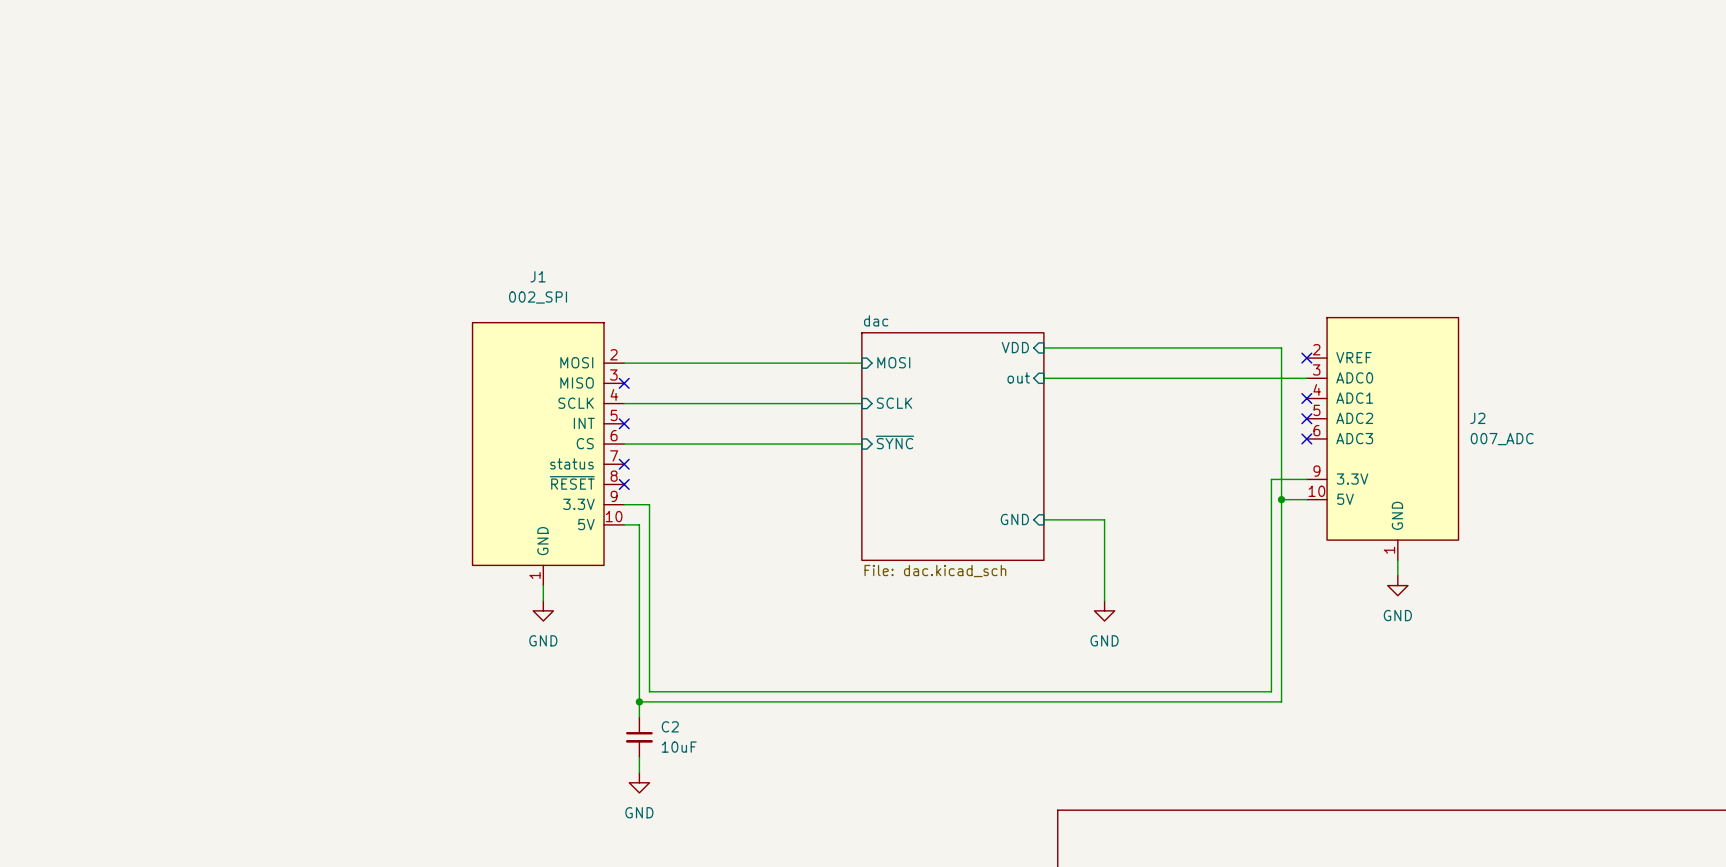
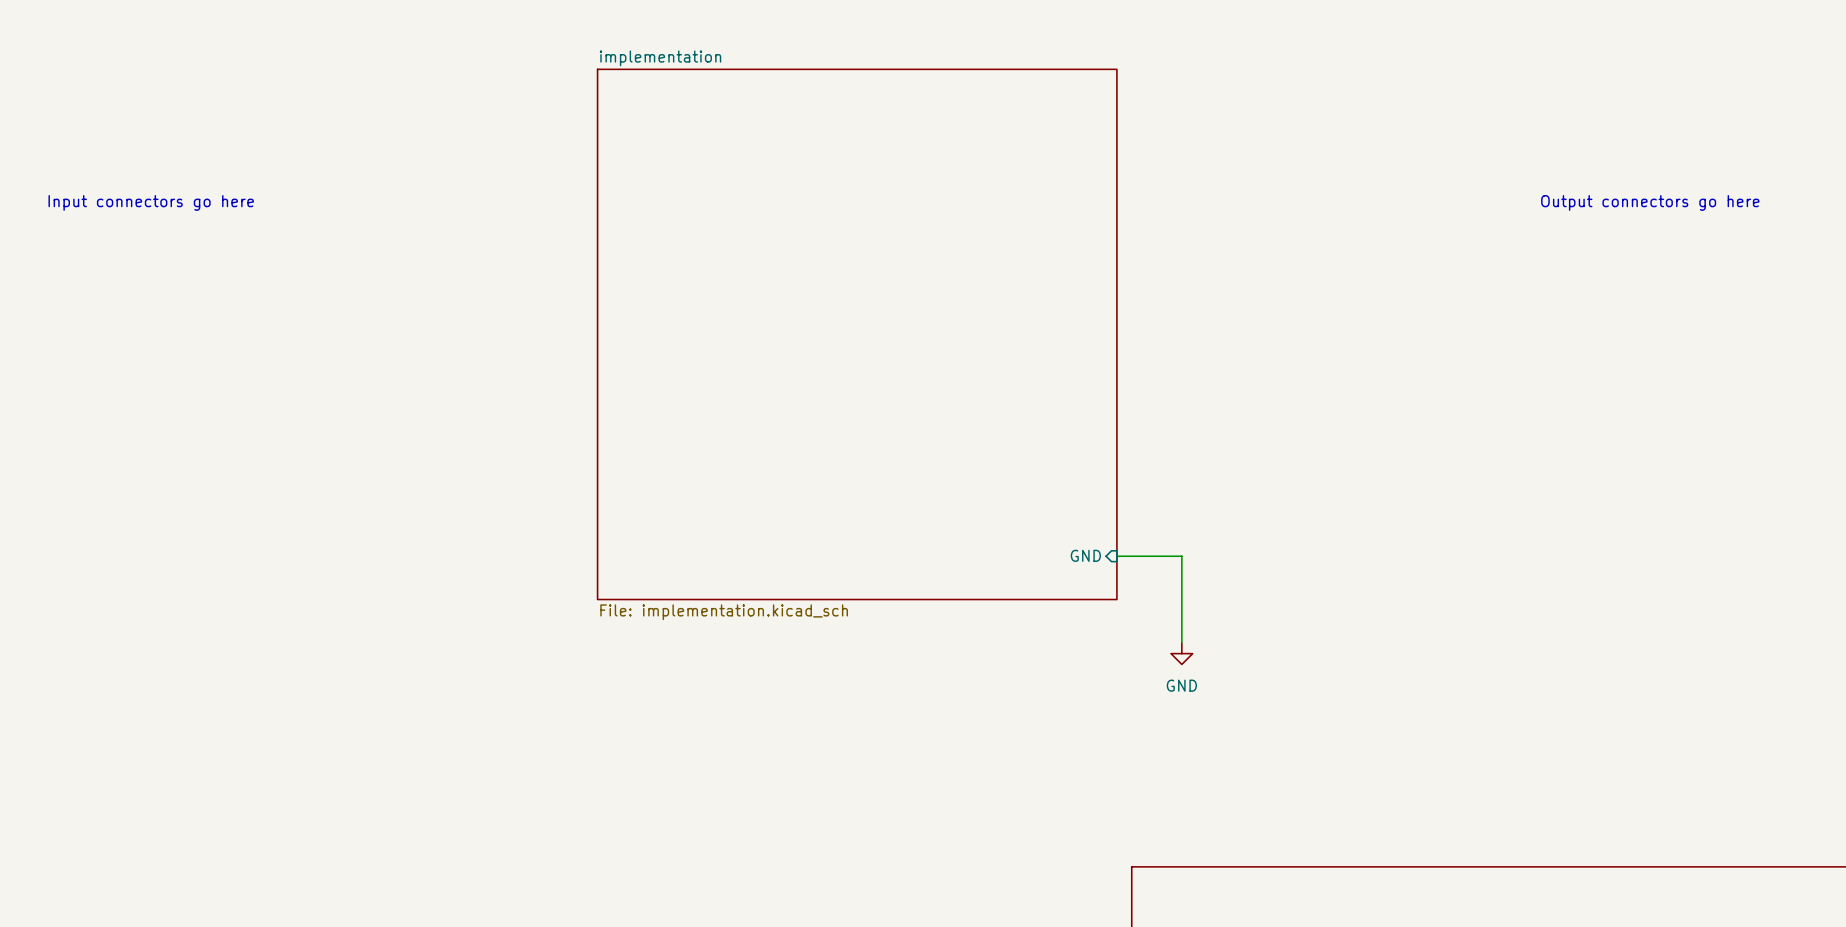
text: none -> Input connectors go here (151, 202)
text: none -> Output connectors go here (1650, 202)
sheet implementation: none -> File: implementation.kicad_sch (857, 334)
sheet pin: VDD (1015, 347) -> none
wire: (1043, 347) (1281, 347) (1281, 701) (639, 701) -> none
no-connect mark: (1306, 358) -> none
sheet pin: MOSI (893, 362) -> none
wire: (624, 363) (861, 363) -> none
sheet pin: out (1018, 377) -> none
wire: (1043, 378) (1306, 378) -> none
no-connect mark: (624, 383) -> none
no-connect mark: (1306, 398) -> none
wire: (624, 403) (861, 403) -> none
sheet pin: SCLK (894, 403) -> none
no-connect mark: (1306, 418) -> none
no-connect mark: (624, 423) -> none
no-connect mark: (1306, 438) -> none
J2: 007_ADC (1382, 438) -> none
sheet pin: ~{SYNC} (895, 442) -> none
wire: (624, 444) (861, 444) -> none
sheet dac: File: dac.kicad_sch (952, 446) -> none
J1: 002_SPI (548, 454) -> none
no-connect mark: (624, 464) -> none
wire: (1306, 479) (1271, 479) (1271, 691) (649, 691) (649, 504) (624, 504) -> none
no-connect mark: (624, 484) -> none
wire: (1281, 499) (1306, 499) -> none
junction: (1281, 499) -> none
wire: (624, 524) (639, 524) (639, 717) -> none
wire: (1397, 560) (1397, 575) -> none
wire: (543, 585) (543, 600) -> none
power symbol: GND (1397, 585) -> none
power symbol: GND (543, 610) -> none
junction: (639, 701) -> none
C2: 10uF (639, 737) -> none
wire: (639, 757) (639, 772) -> none
power symbol: GND (639, 782) -> none

